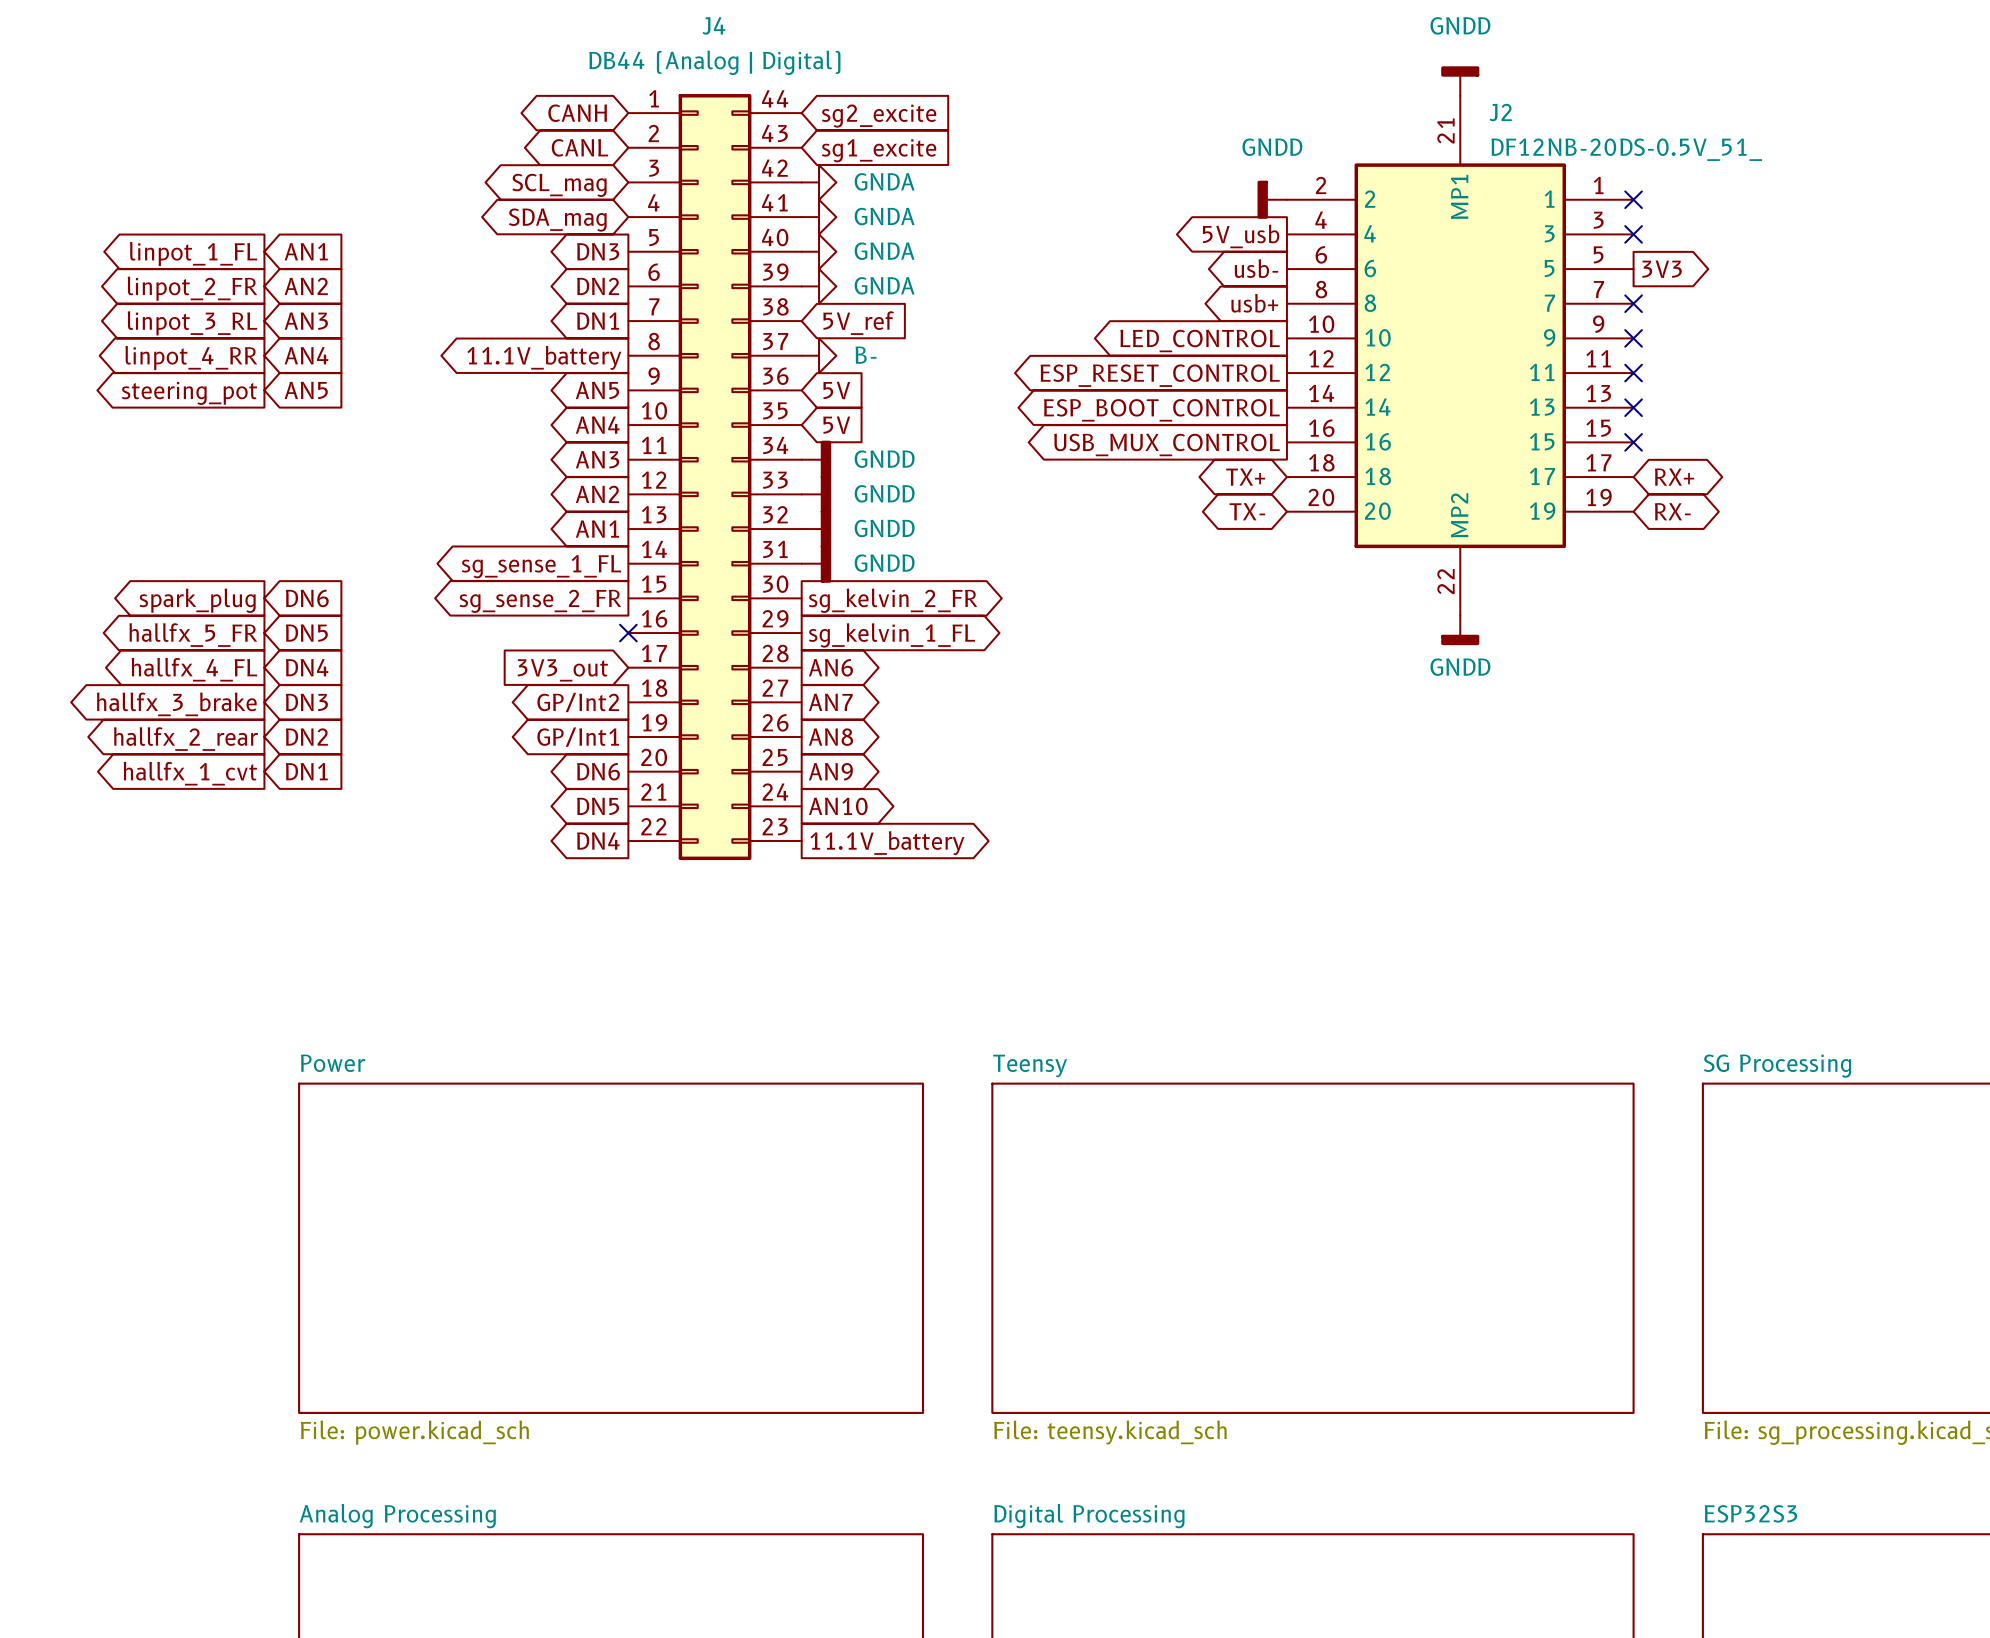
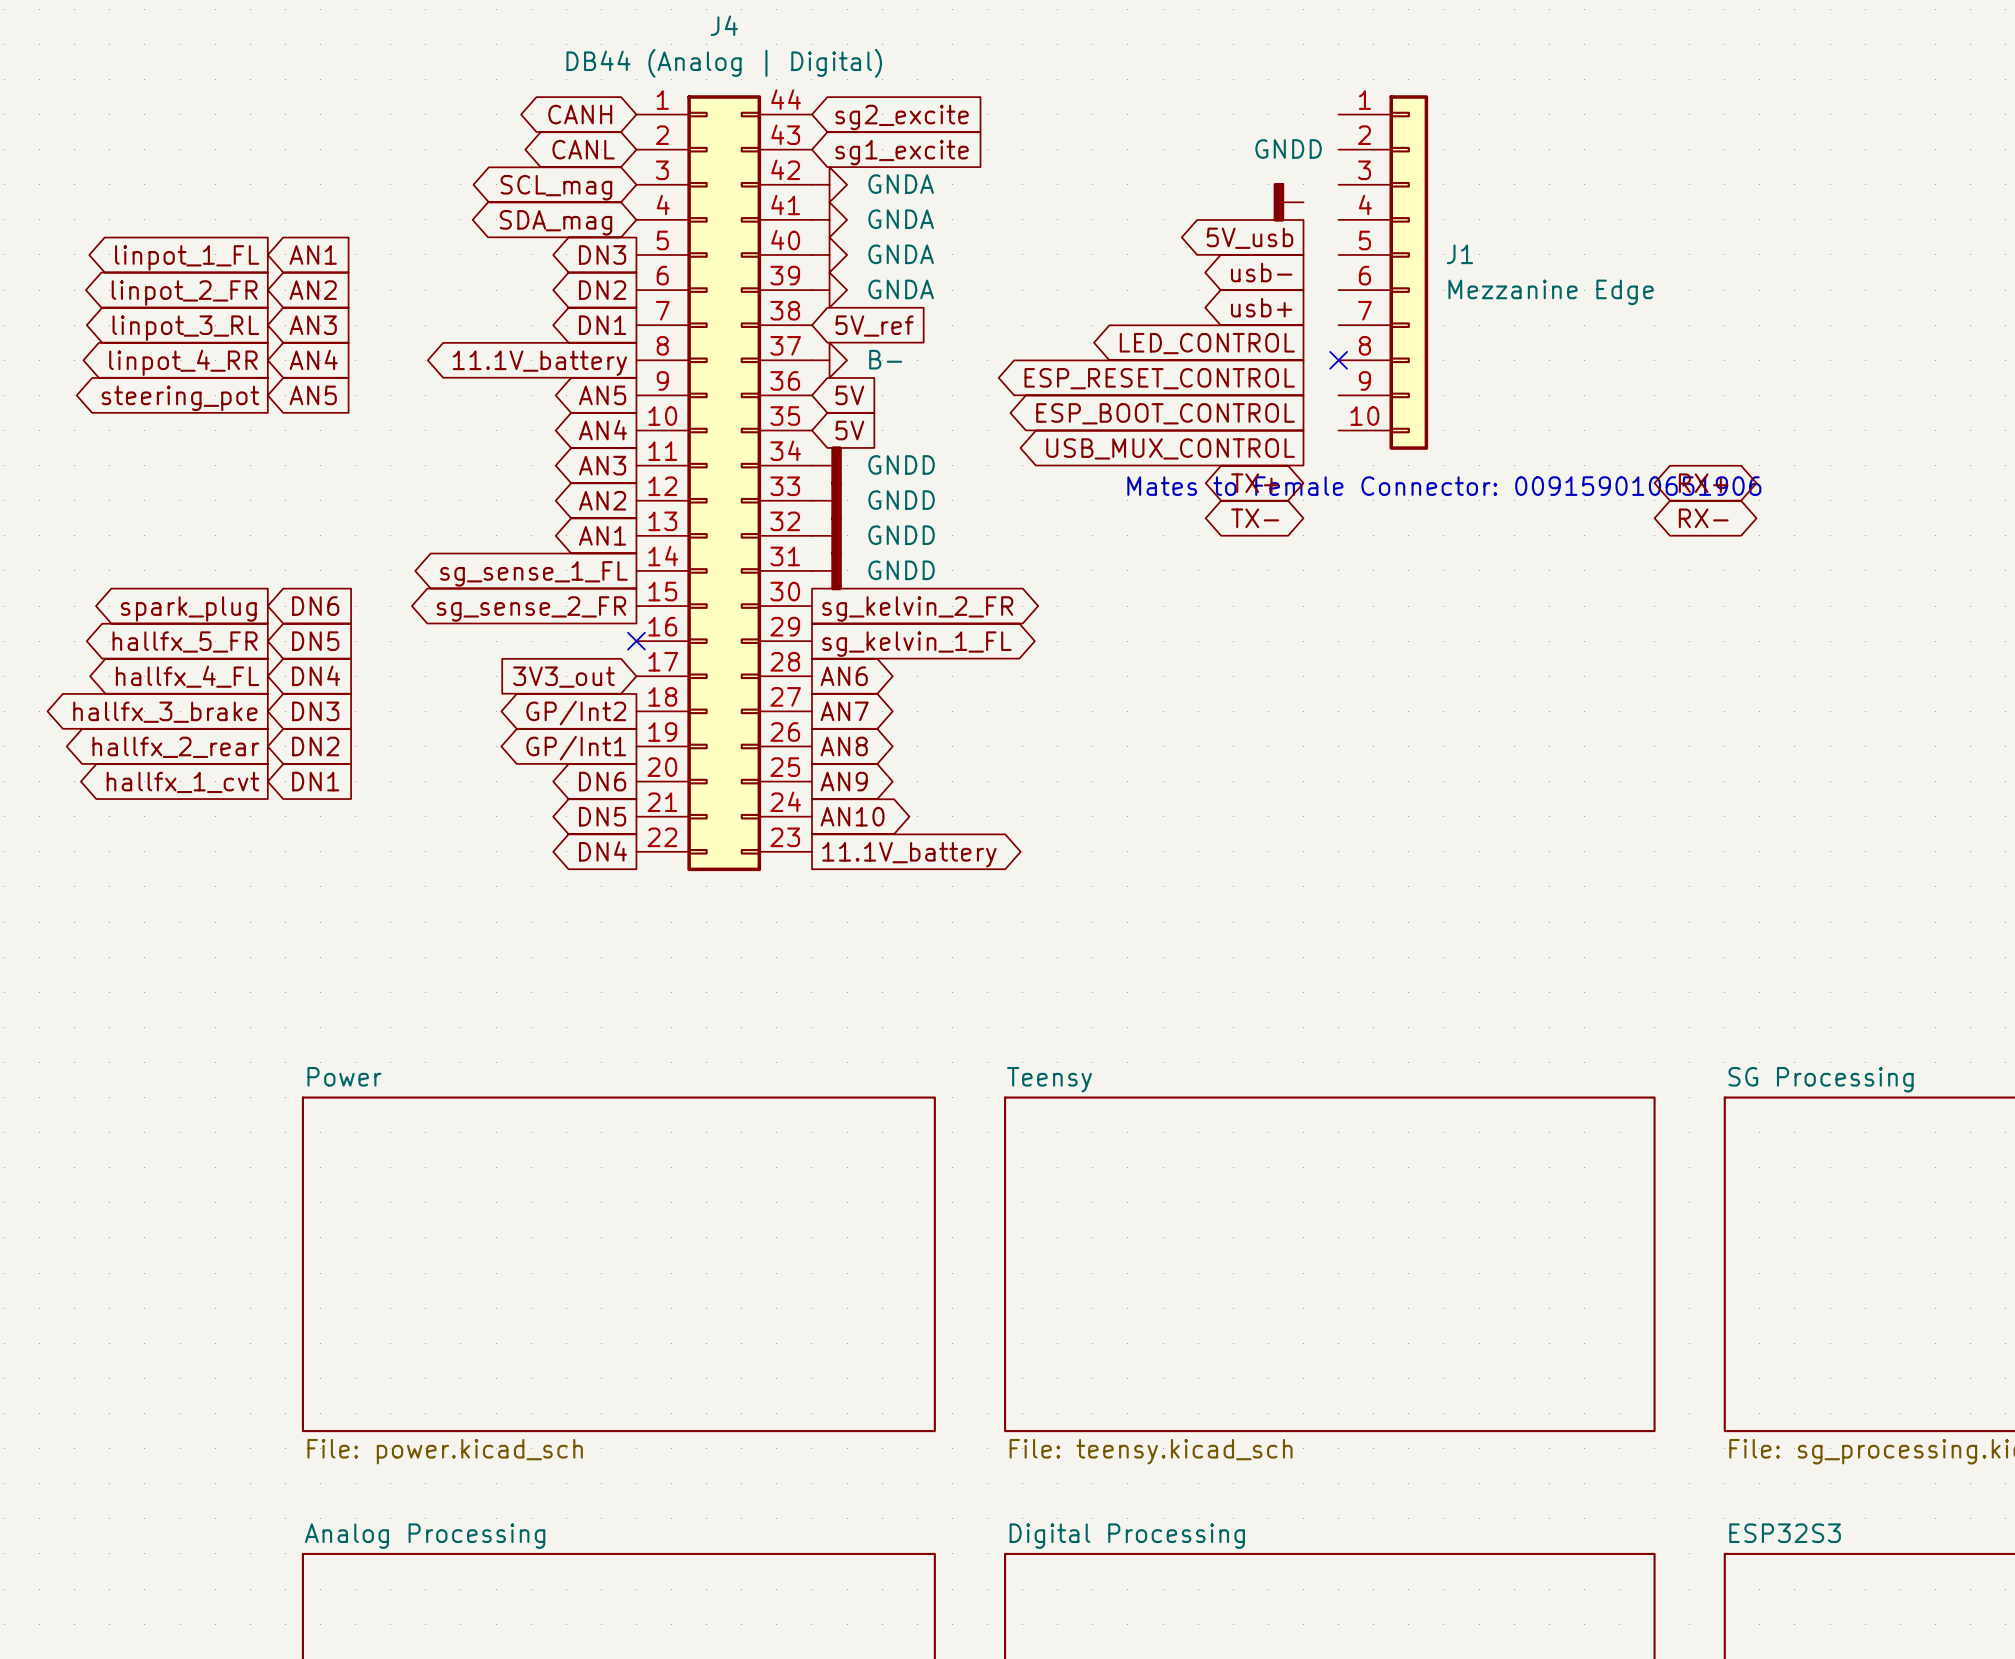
power symbol: GNDD (1460, 81) -> none
no-connect mark: (1633, 199) -> none
no-connect mark: (1633, 234) -> none
J1: none -> Mezzanine Edge (1383, 272)
global label: 3V3 (1662, 269) -> none
no-connect mark: (1633, 303) -> none
no-connect mark: (1633, 338) -> none
no-connect mark: none -> (1338, 360)
J2: DF12NB-20DS-0.5V_51_ (1460, 355) -> none
no-connect mark: (1633, 373) -> none
no-connect mark: (1633, 407) -> none
no-connect mark: (1633, 442) -> none
text: none -> Mates to Female Connector: 009159010651906 (1444, 486)
power symbol: GNDD (1460, 630) -> none

